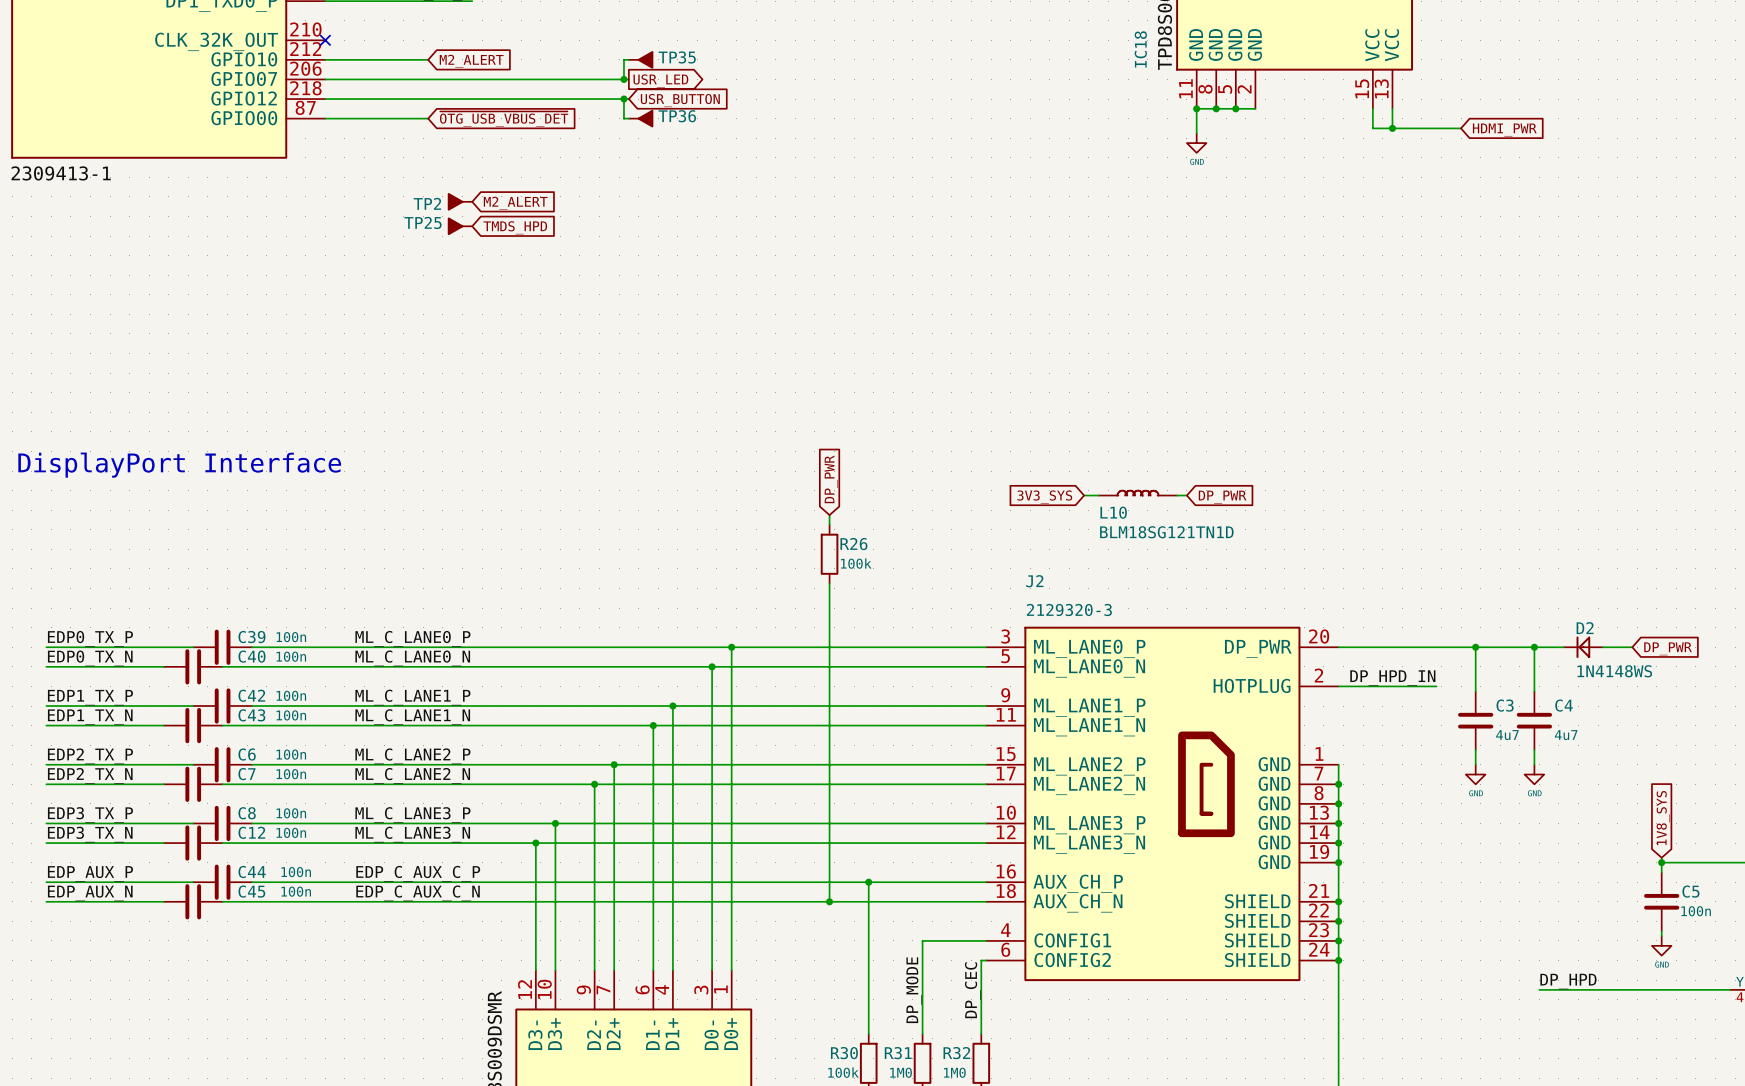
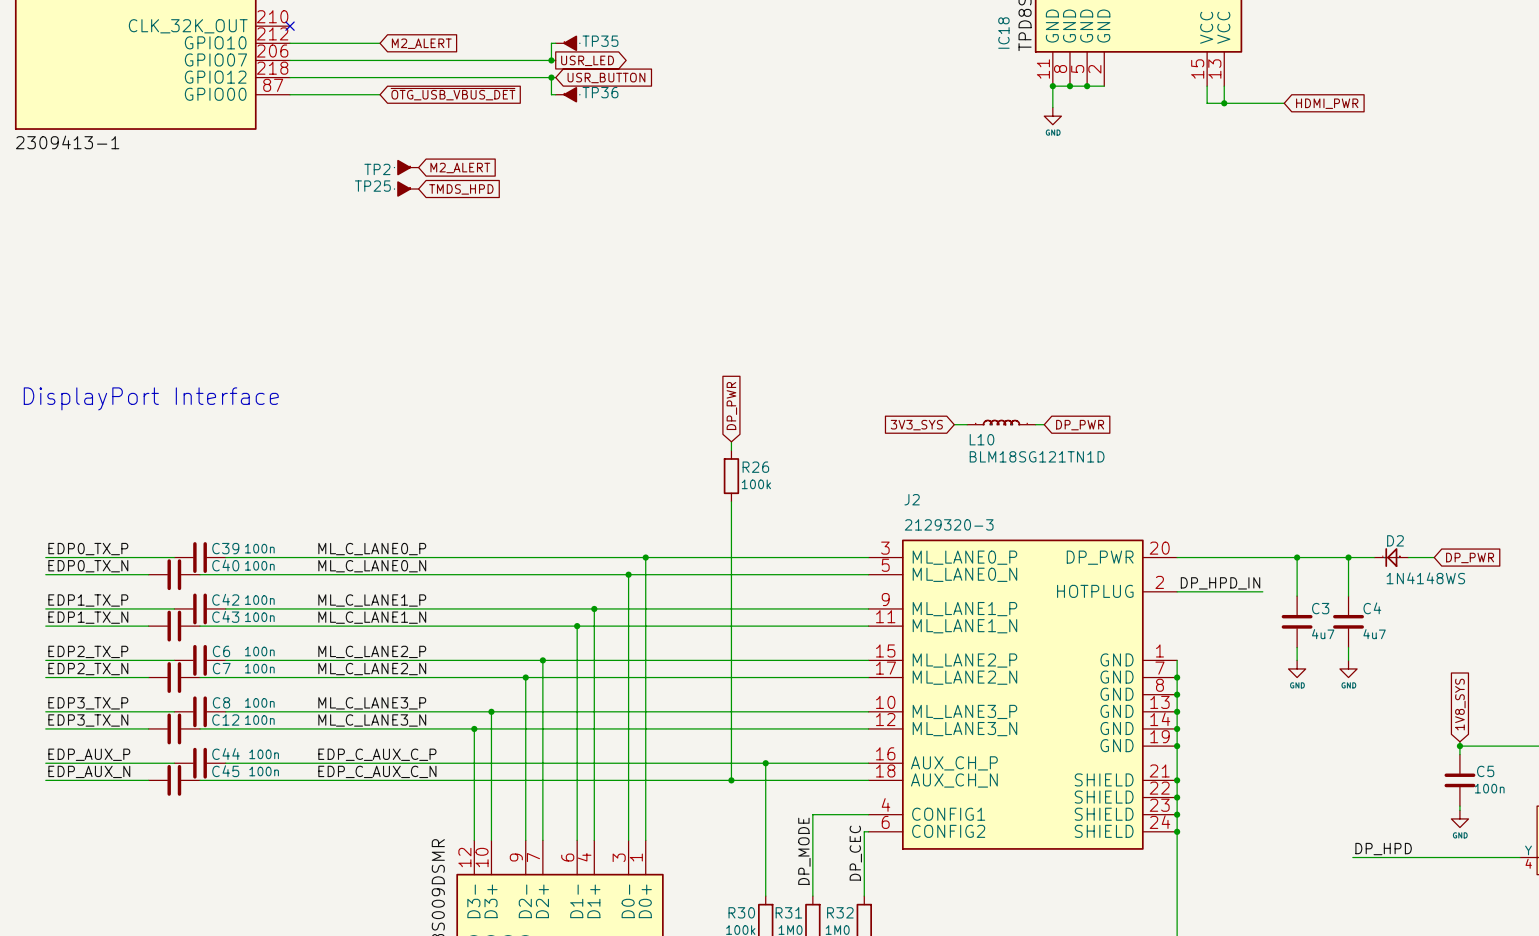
J2 symbol: [986, 626, 1339, 982] -> [868, 539, 1178, 850]

